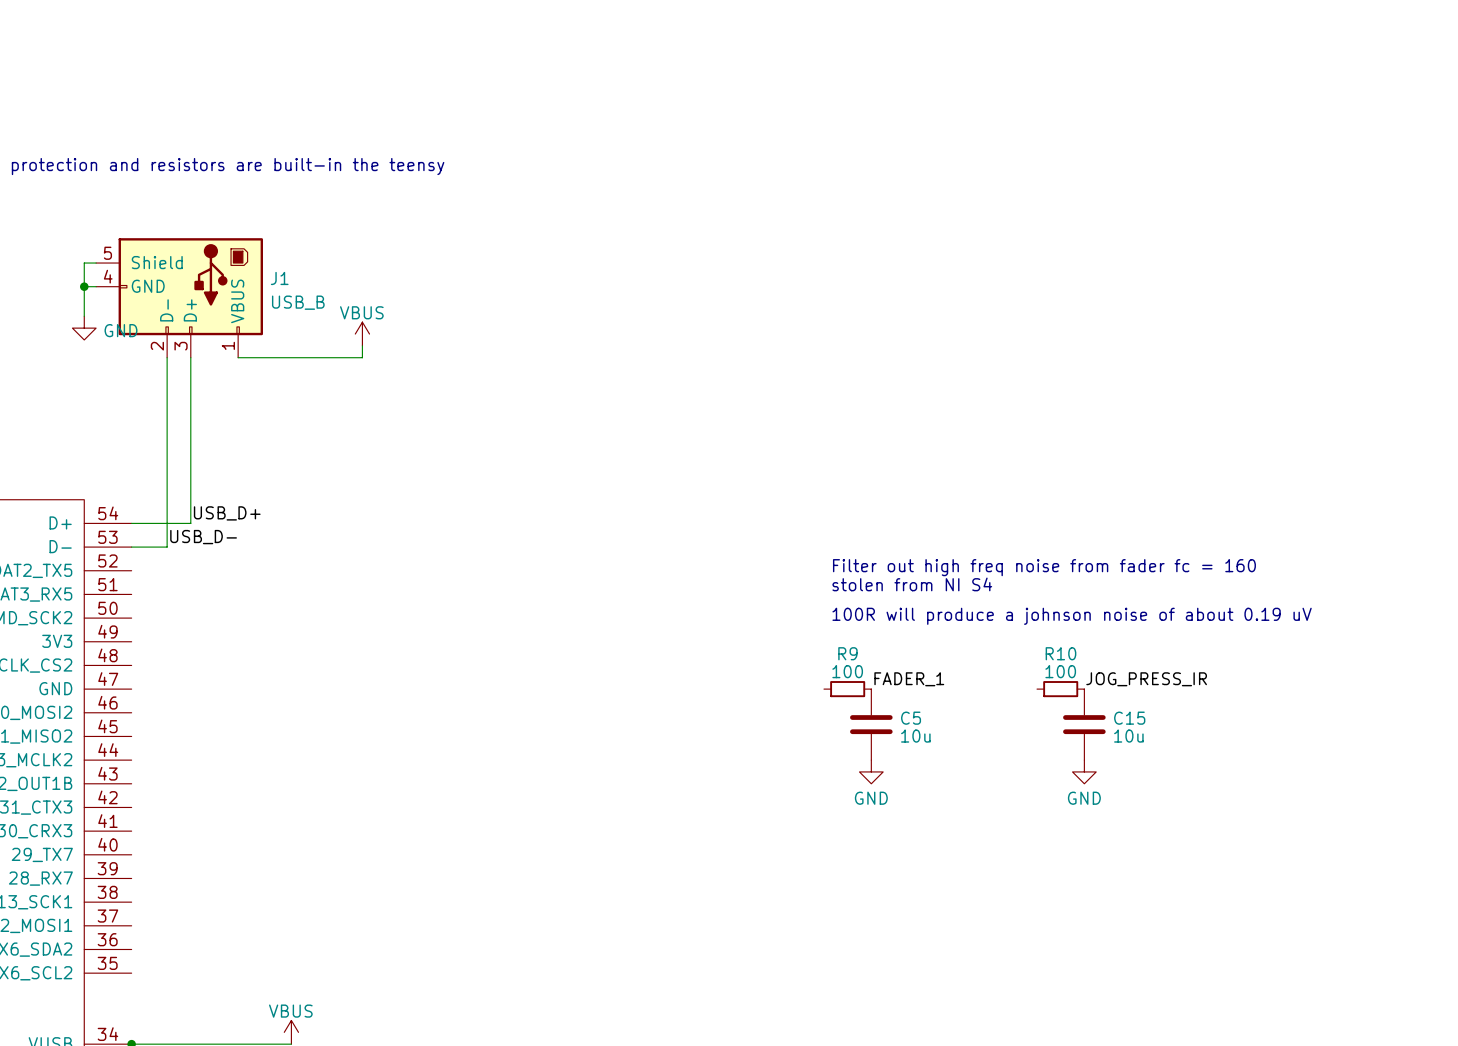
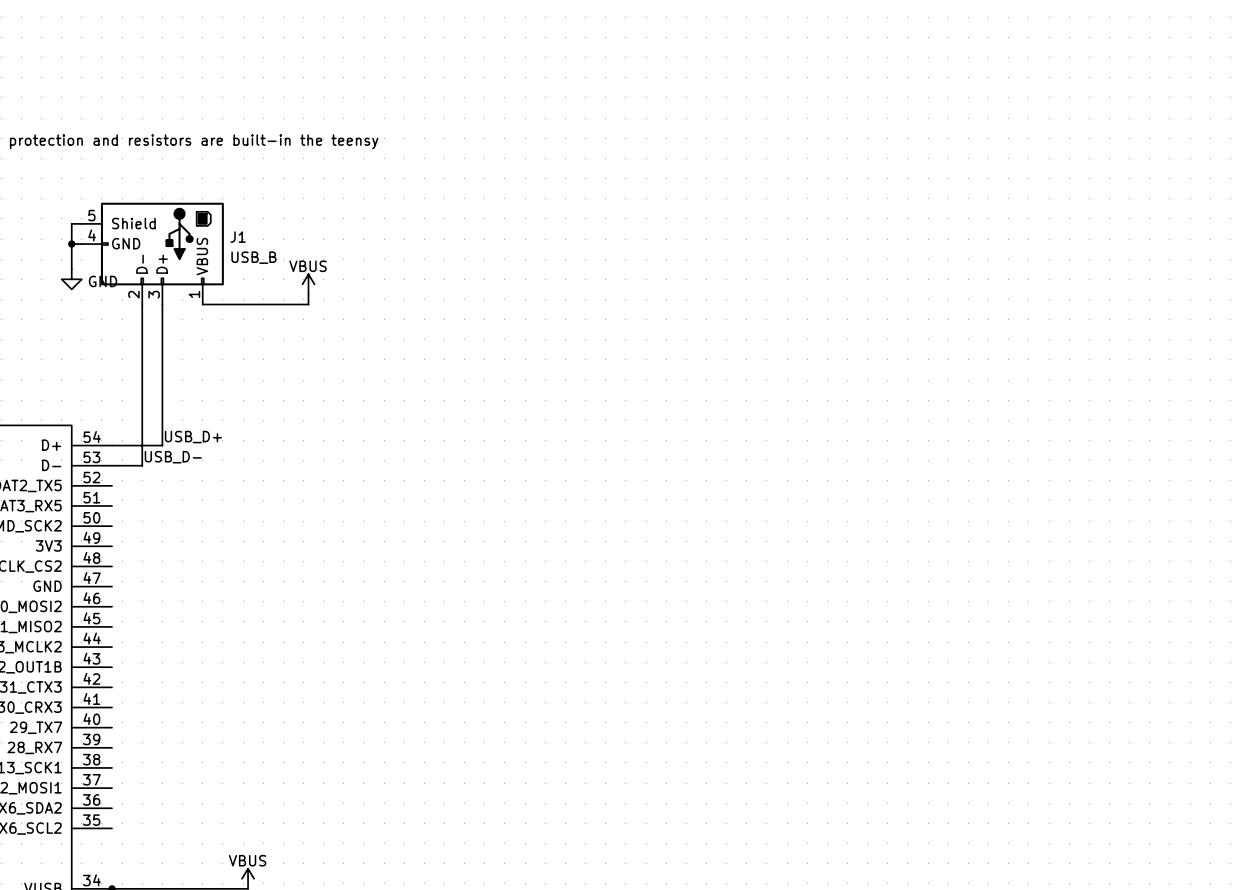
text: Filter out high freq noise from fader fc = 160 (1044, 567) -> none
text: stolen from NI S4 (912, 584) -> none
text: 100R will produce a johnson noise of about 0.19 uV (1072, 616) -> none
label: FADER_1 (909, 679) -> none
label: JOG_PRESS_IR (1146, 679) -> none
R9: 100 (847, 689) -> none
R10: 100 (1060, 689) -> none
C5: 10u (871, 724) -> none
C15: 10u (1084, 724) -> none
power symbol: GND (871, 771) -> none
power symbol: GND (1084, 771) -> none

